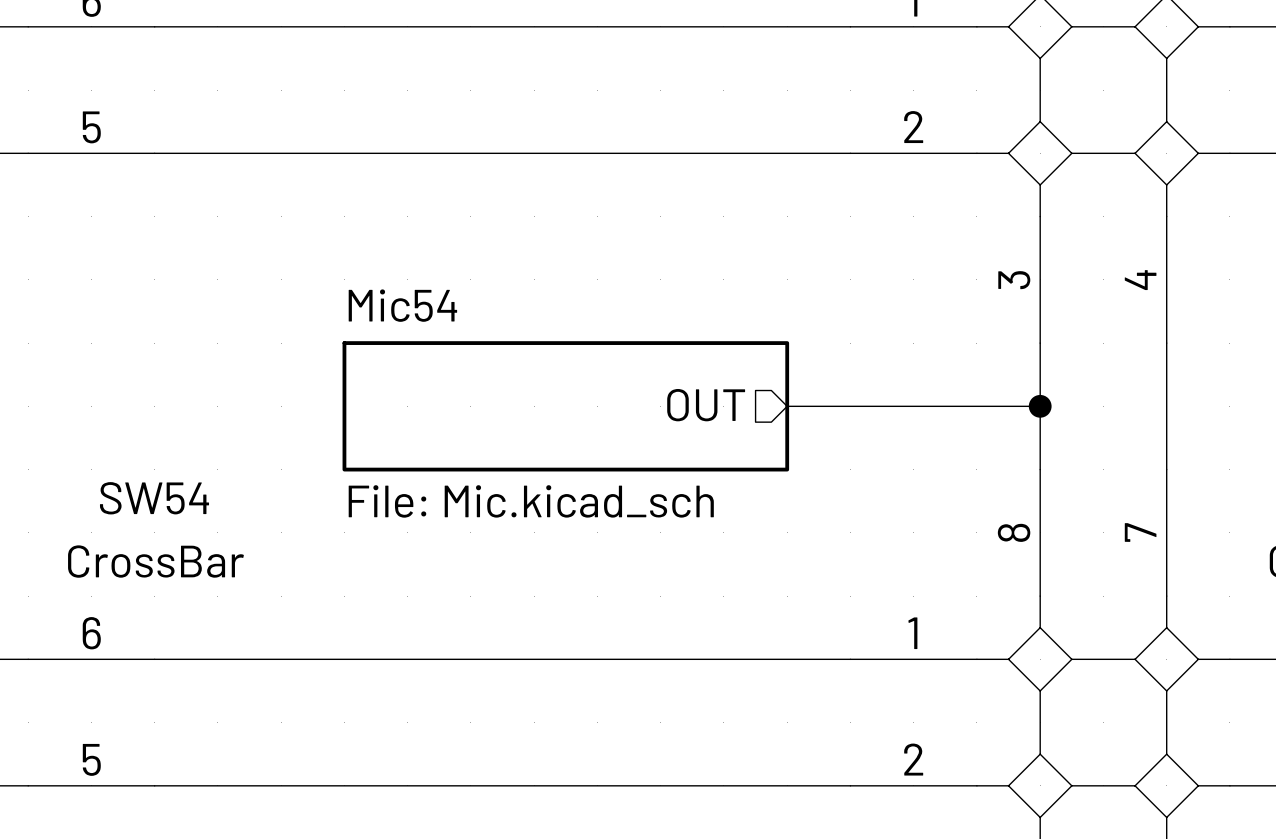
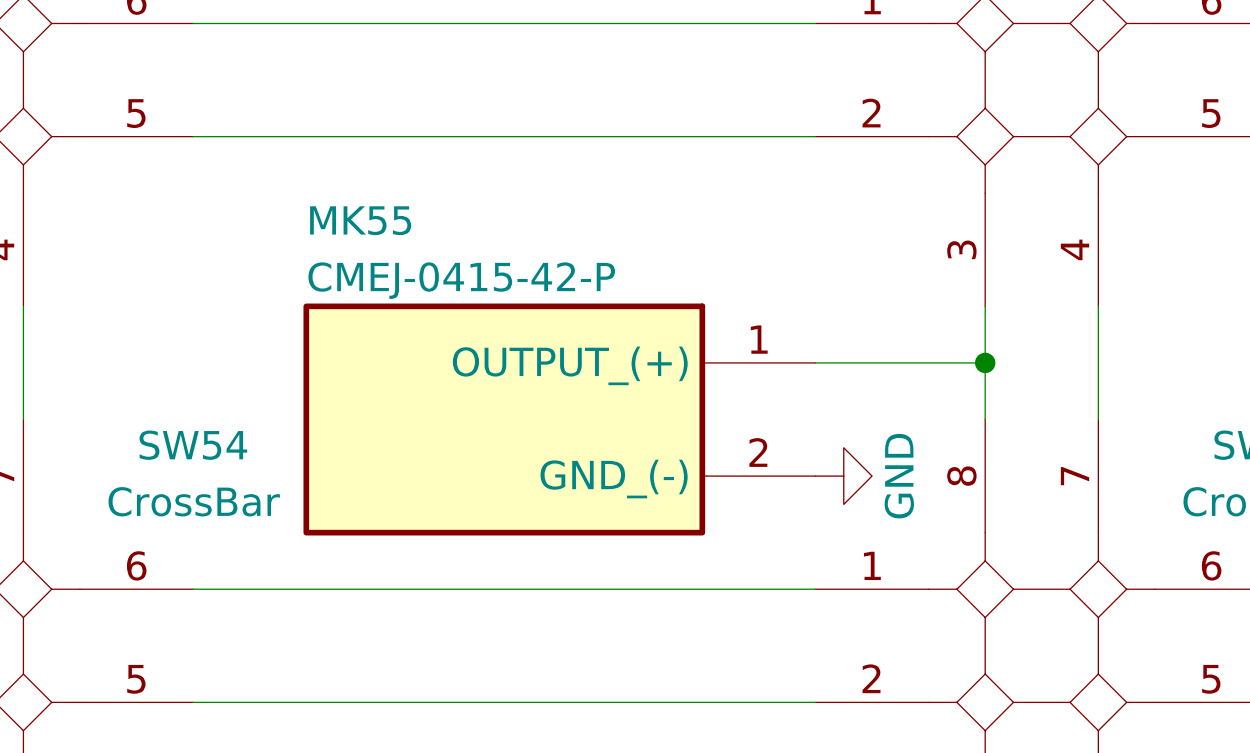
sheet pin: OUT (706, 405) -> none
sheet Mic54: File: Mic.kicad_sch (565, 406) -> none
MK55: none -> CMEJ-0415-42-P (559, 419)
power symbol: none -> GND (843, 476)

